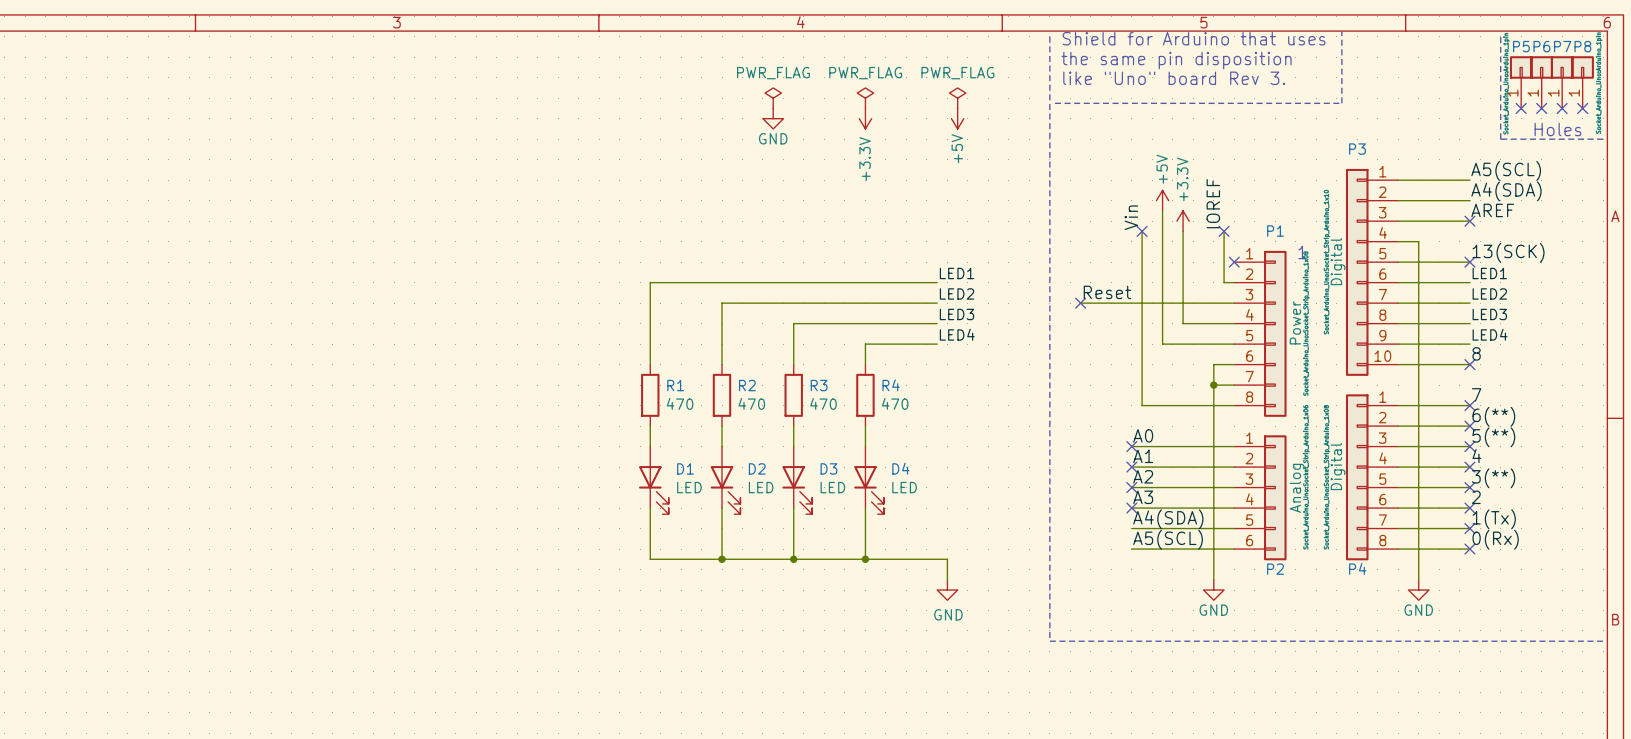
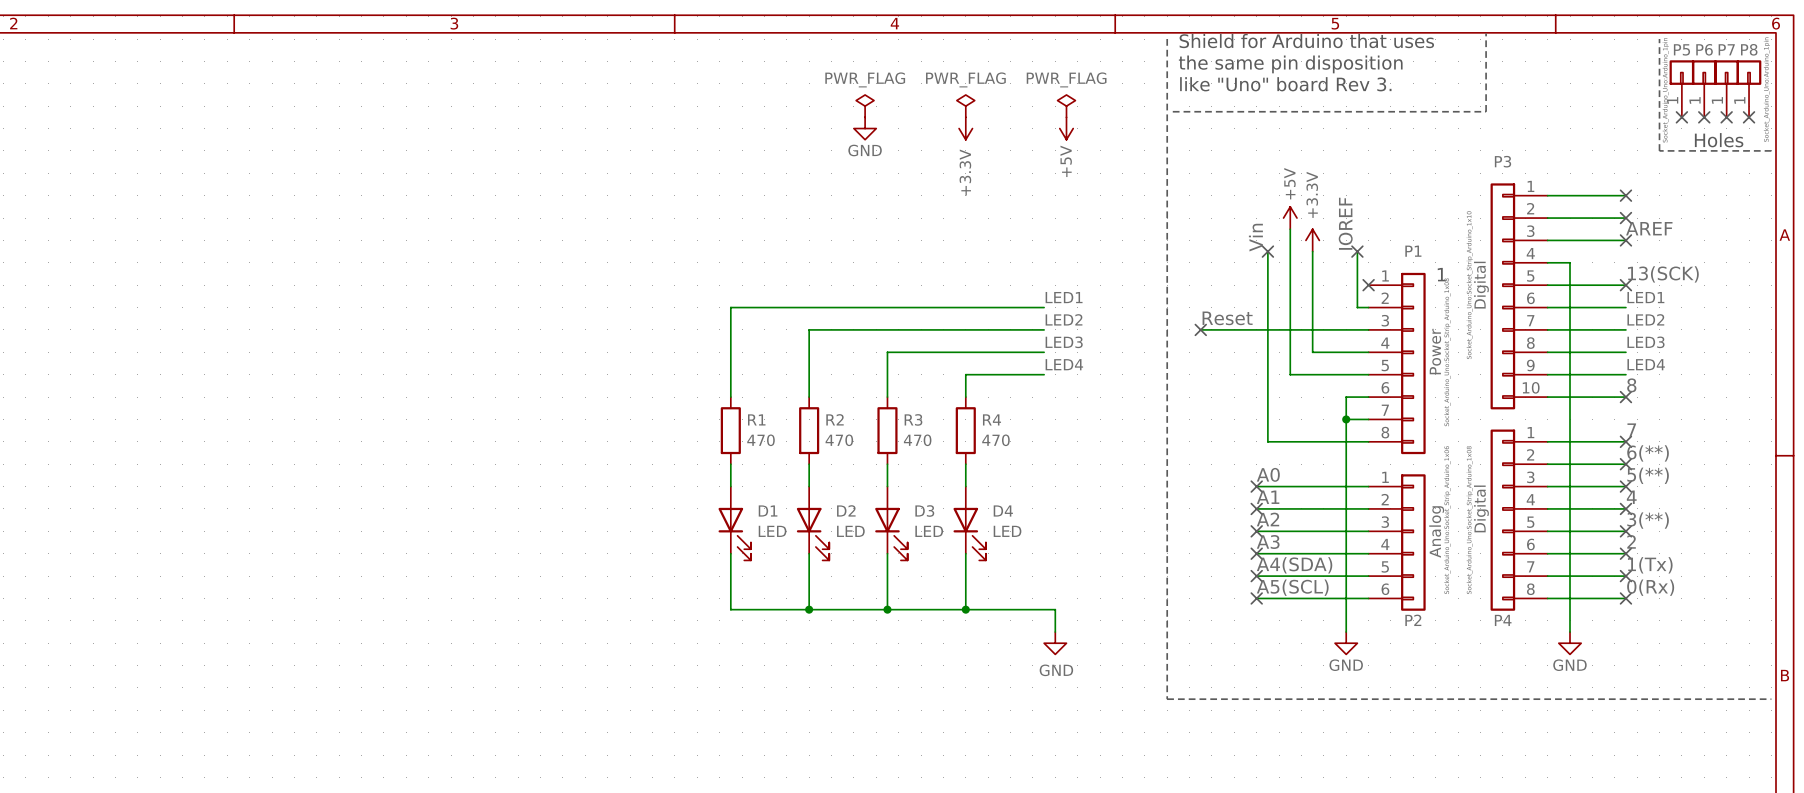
label: A5(SCL) (1506, 170) -> none
no-connect mark: none -> (1625, 195)
label: A4(SDA) (1506, 191) -> none
no-connect mark: none -> (1625, 218)
no-connect mark: none -> (1256, 576)
no-connect mark: none -> (1256, 598)

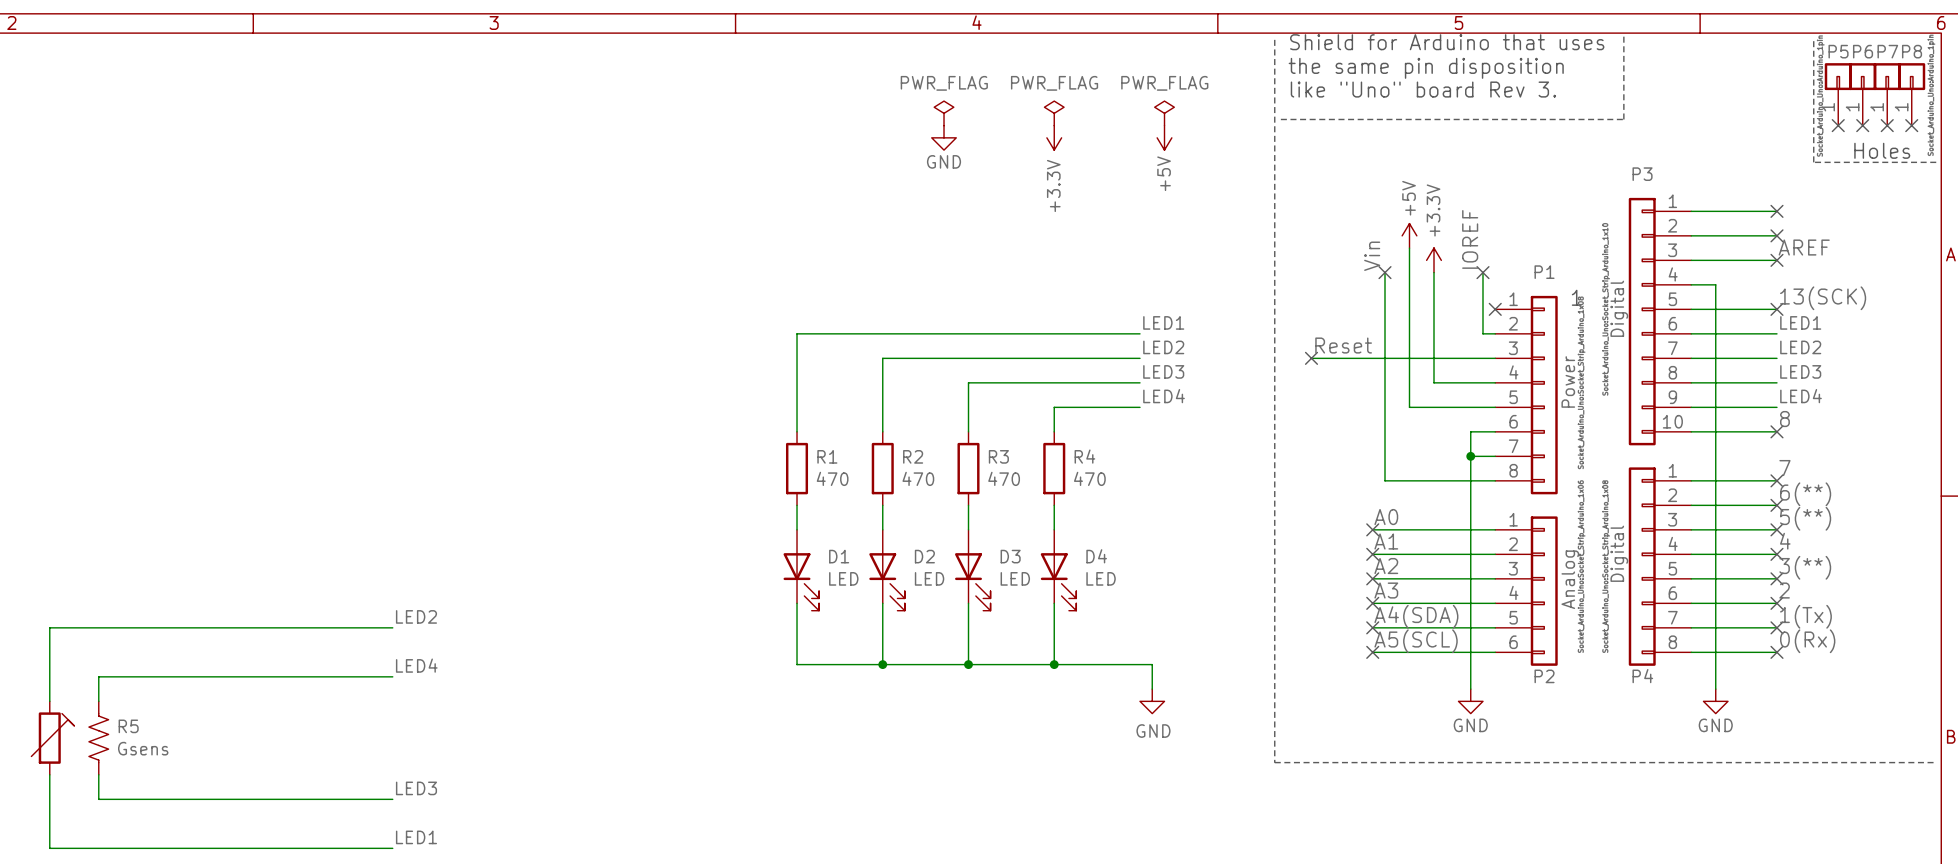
label: none -> LED2 (416, 616)
wire: none -> (392, 627) (49, 627) (49, 701)
label: none -> LED4 (416, 665)
wire: none -> (392, 676) (98, 676) (98, 701)
R5: none -> Gsens (69, 738)
wire: none -> (49, 774) (49, 848) (392, 848)
wire: none -> (98, 774) (98, 799) (392, 799)
label: none -> LED3 (416, 788)
label: none -> LED1 (416, 837)

